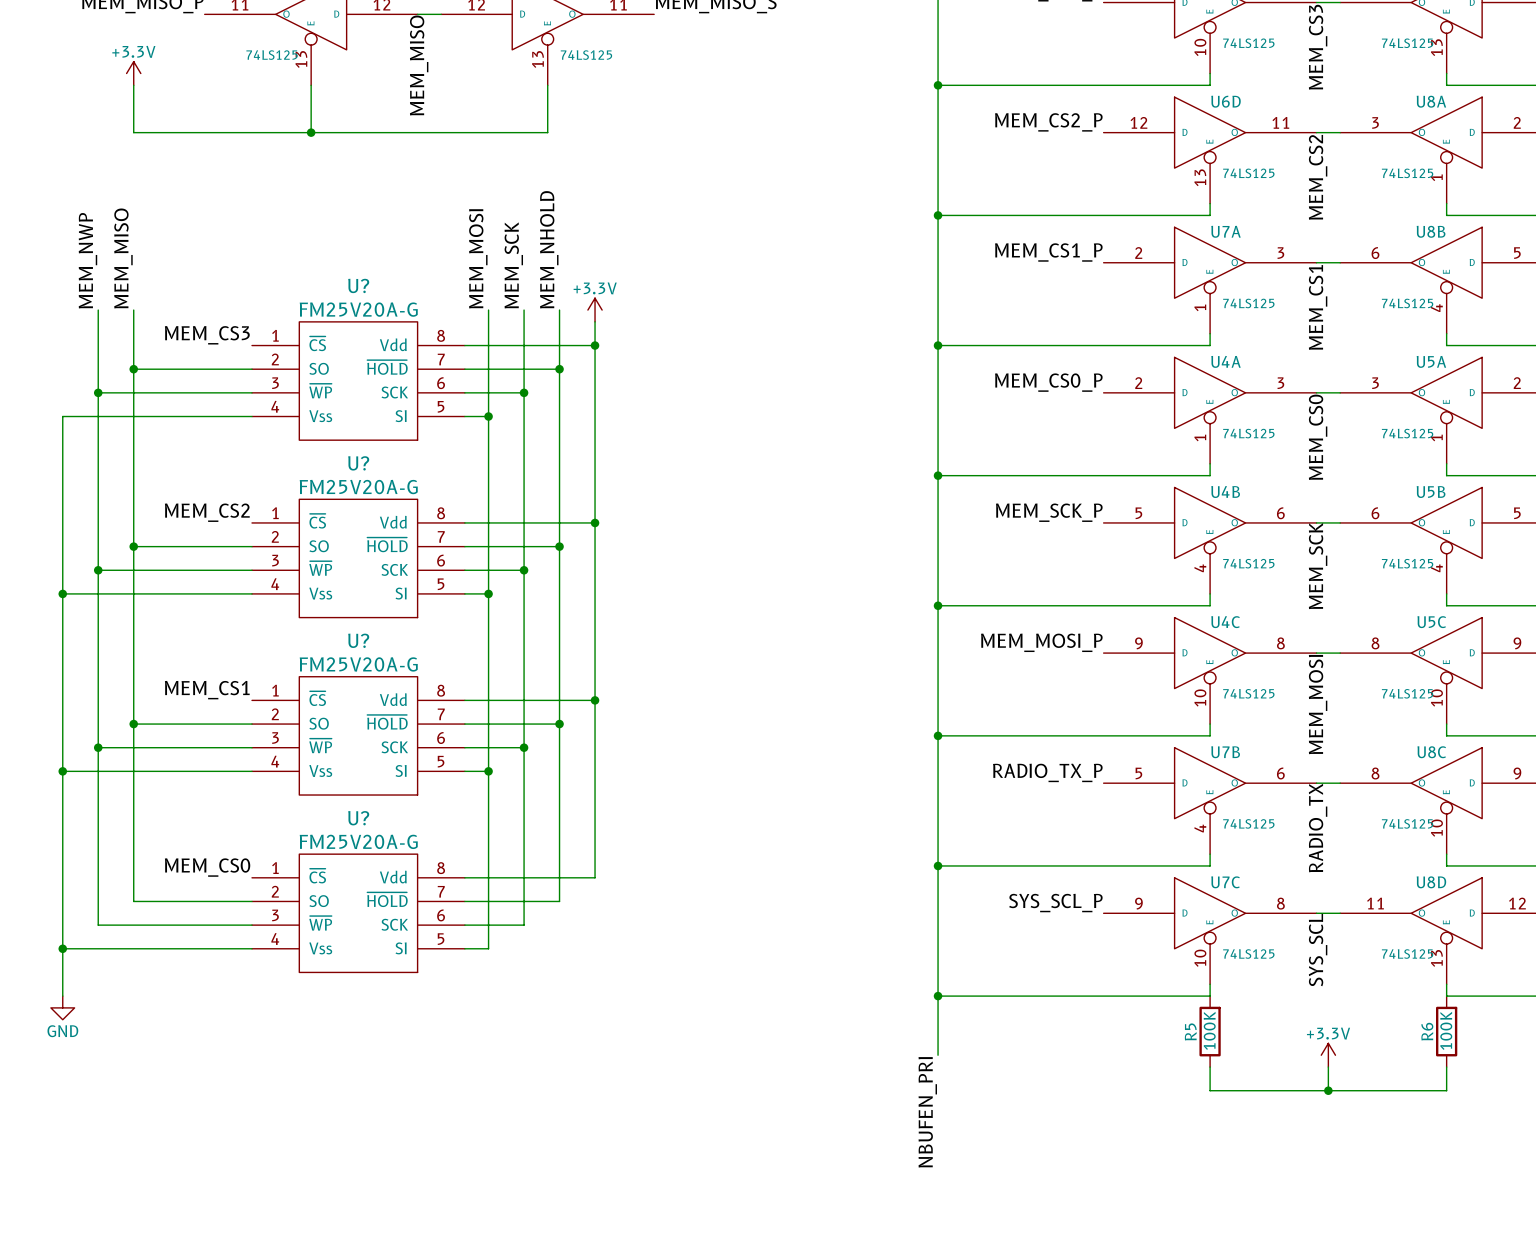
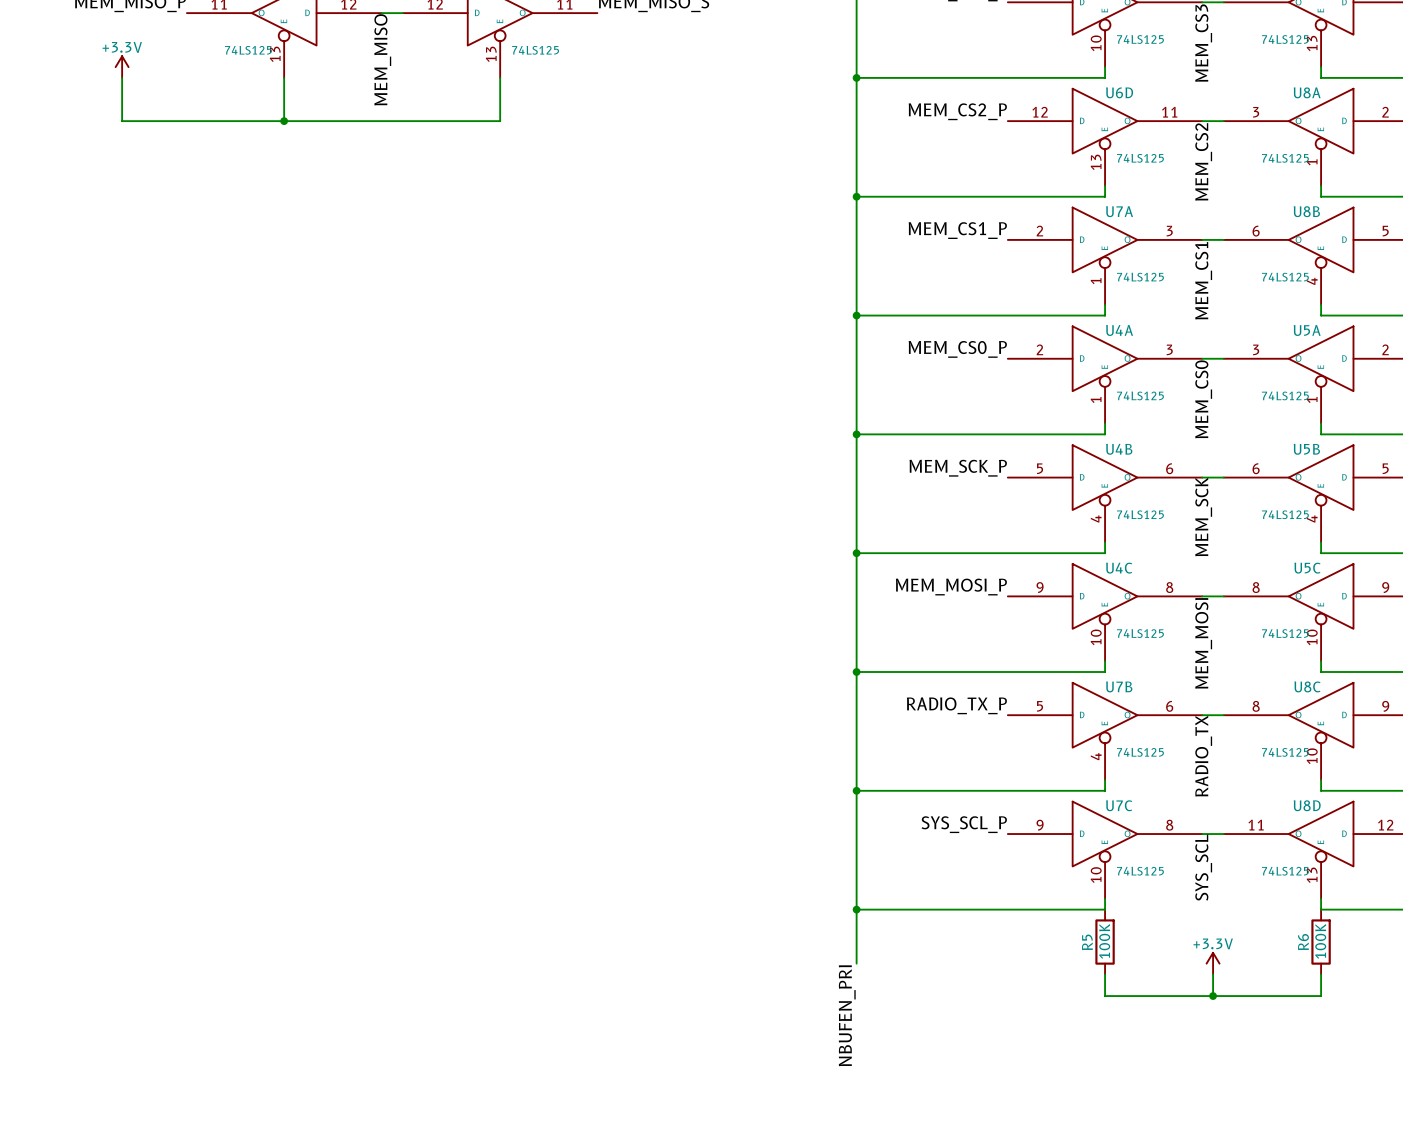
label: MEM_NHOLD (549, 249) -> none
label: MEM_MISO (123, 258) -> none
label: MEM_MOSI (478, 258) -> none
label: MEM_NWP (87, 260) -> none
label: MEM_SCK (513, 265) -> none
wire: (98, 310) (98, 925) (252, 925) -> none
wire: (133, 310) (133, 901) (252, 901) -> none
wire: (488, 310) (488, 948) (464, 948) -> none
wire: (524, 310) (524, 925) (464, 925) -> none
wire: (559, 310) (559, 901) (464, 901) -> none
power symbol: +3.3V (595, 310) -> none
wire: (595, 321) (595, 877) (464, 877) -> none
label: MEM_CS3 (207, 335) -> none
wire: (464, 345) (595, 345) -> none
junction: (595, 345) -> none
wire: (133, 369) (252, 369) -> none
junction: (133, 369) -> none
wire: (464, 369) (559, 369) -> none
junction: (559, 369) -> none
U?: FM25V20A-G (358, 386) -> none
wire: (98, 392) (252, 392) -> none
junction: (98, 392) -> none
wire: (464, 392) (524, 392) -> none
junction: (524, 392) -> none
wire: (252, 416) (62, 416) (62, 996) -> none
wire: (464, 416) (488, 416) -> none
junction: (488, 416) -> none
label: MEM_CS2 (207, 512) -> none
wire: (464, 522) (595, 522) -> none
junction: (595, 522) -> none
wire: (133, 546) (252, 546) -> none
junction: (133, 546) -> none
wire: (464, 546) (559, 546) -> none
junction: (559, 546) -> none
U?: FM25V20A-G (358, 564) -> none
wire: (98, 570) (252, 570) -> none
junction: (98, 570) -> none
wire: (464, 570) (524, 570) -> none
junction: (524, 570) -> none
wire: (62, 593) (252, 593) -> none
junction: (62, 593) -> none
wire: (464, 593) (488, 593) -> none
junction: (488, 593) -> none
label: MEM_CS1 (207, 690) -> none
wire: (464, 700) (595, 700) -> none
junction: (595, 700) -> none
wire: (133, 724) (252, 724) -> none
junction: (133, 724) -> none
wire: (464, 724) (559, 724) -> none
junction: (559, 724) -> none
U?: FM25V20A-G (358, 741) -> none
wire: (98, 747) (252, 747) -> none
junction: (98, 747) -> none
wire: (464, 747) (524, 747) -> none
junction: (524, 747) -> none
wire: (62, 771) (252, 771) -> none
junction: (62, 771) -> none
wire: (464, 771) (488, 771) -> none
junction: (488, 771) -> none
label: MEM_CS0 (207, 867) -> none
U?: FM25V20A-G (358, 919) -> none
wire: (62, 948) (252, 948) -> none
junction: (62, 948) -> none
power symbol: GND (62, 1007) -> none

